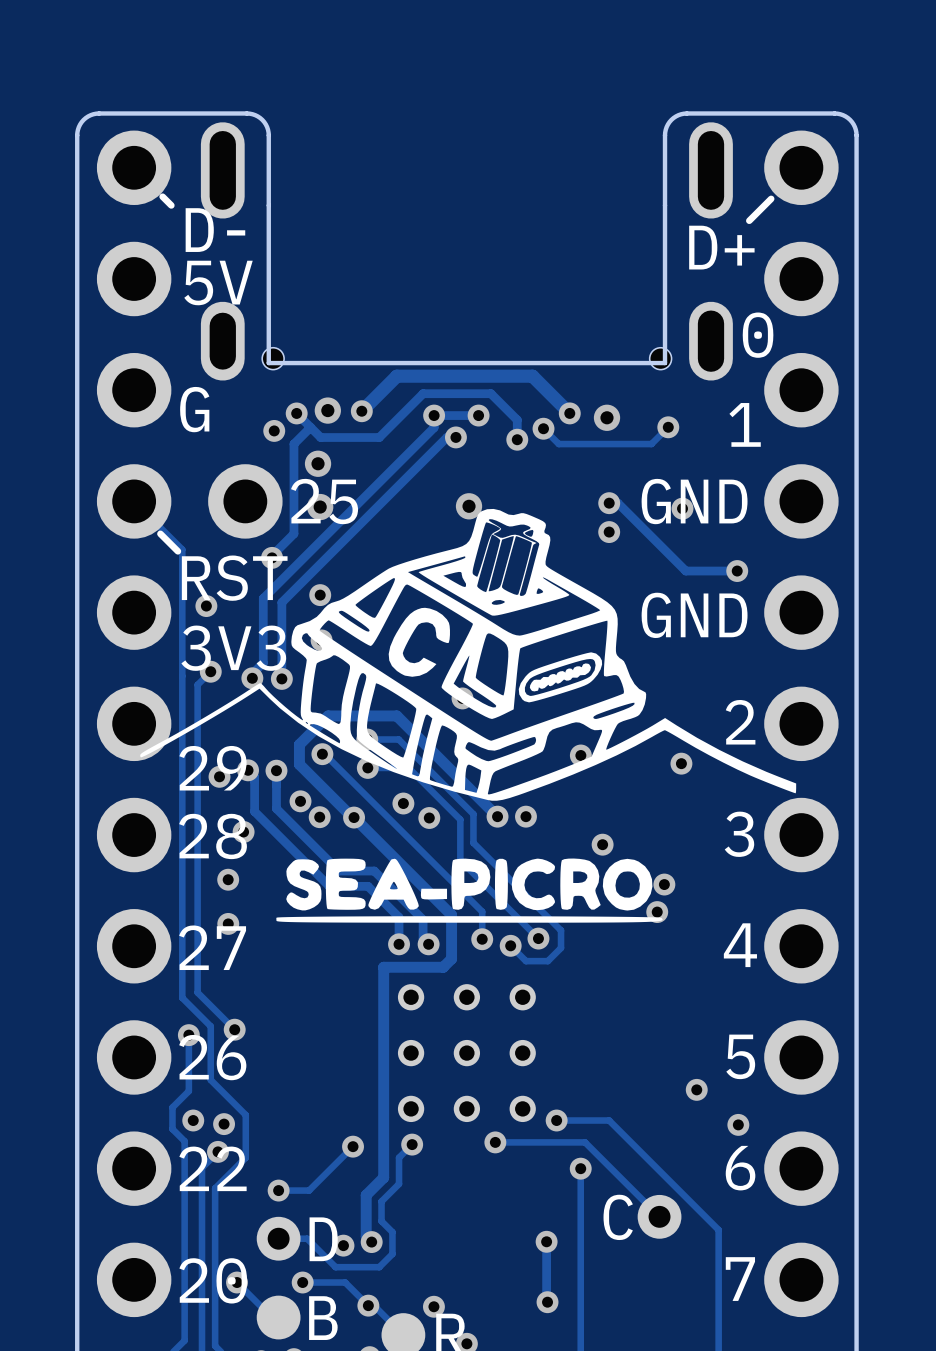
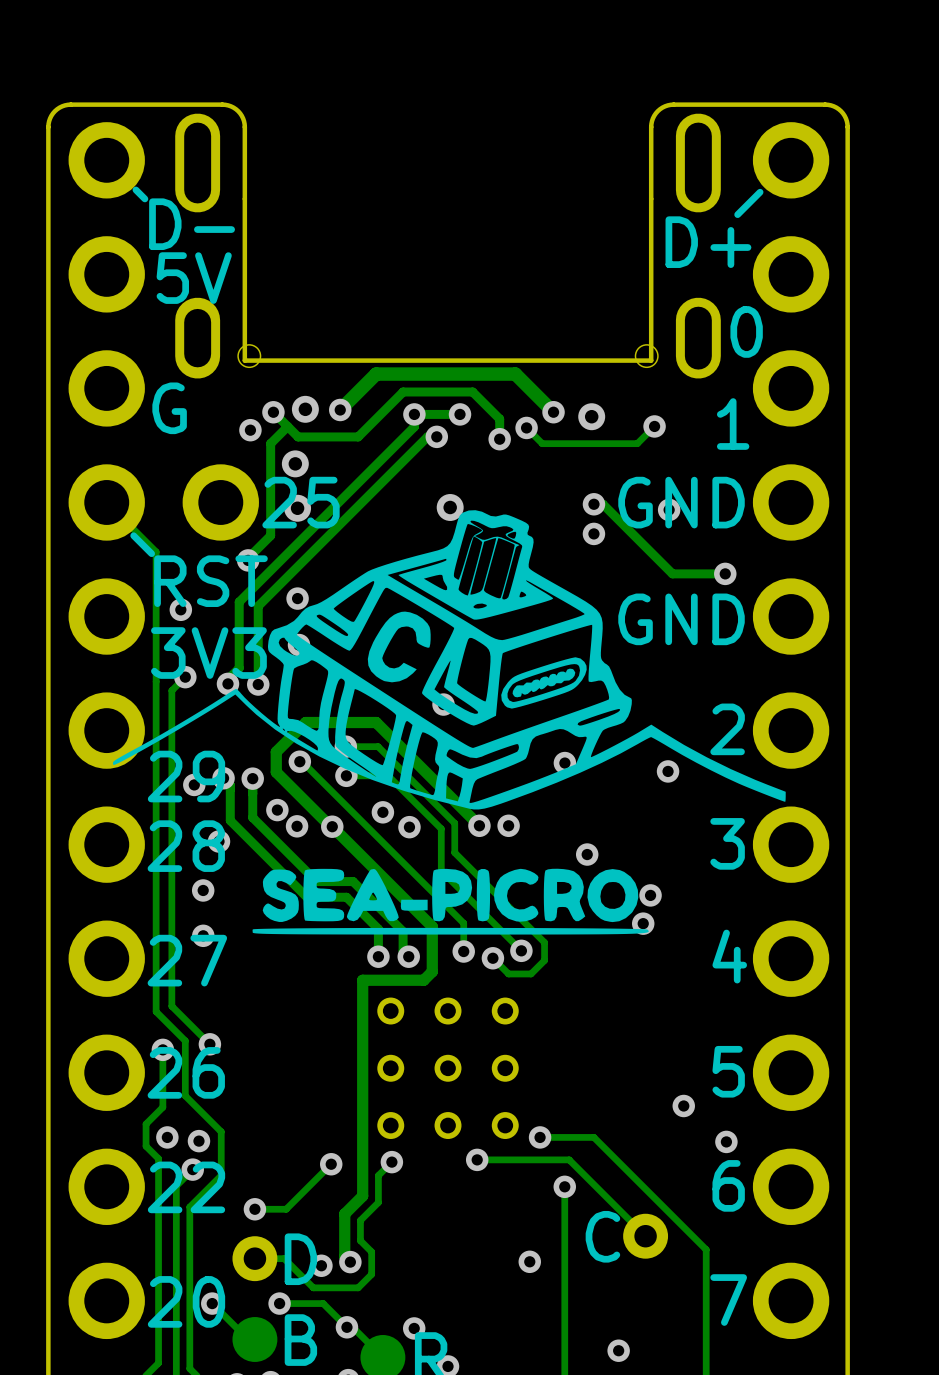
track: (546, 1241) (547, 1302) -> none
via: (547, 1302) -> none
via: none -> (618, 1350)

